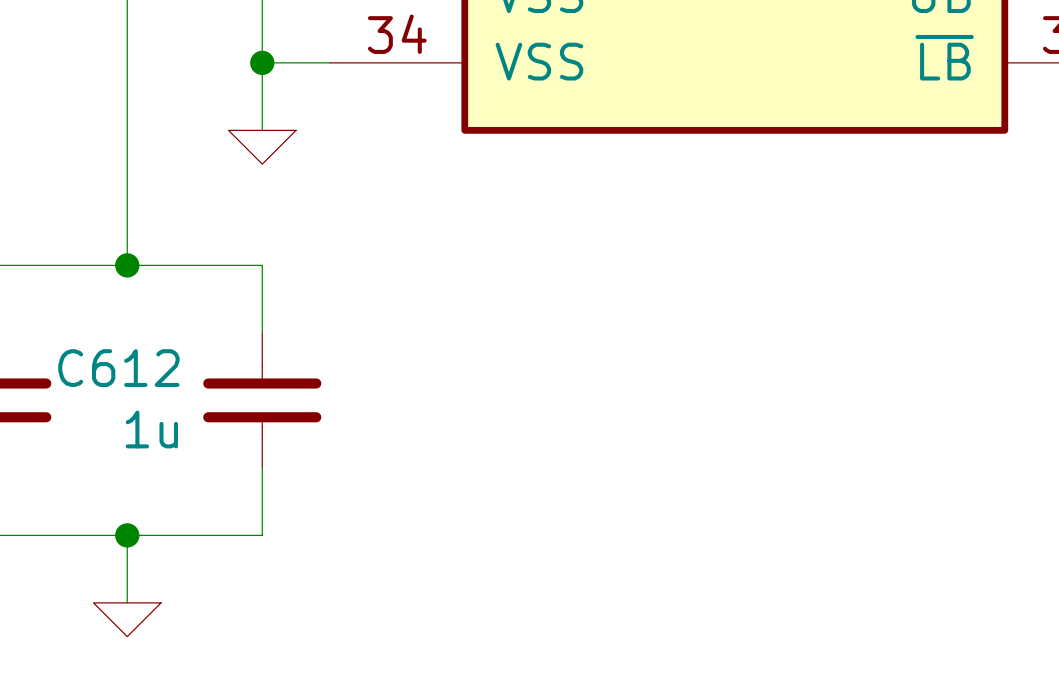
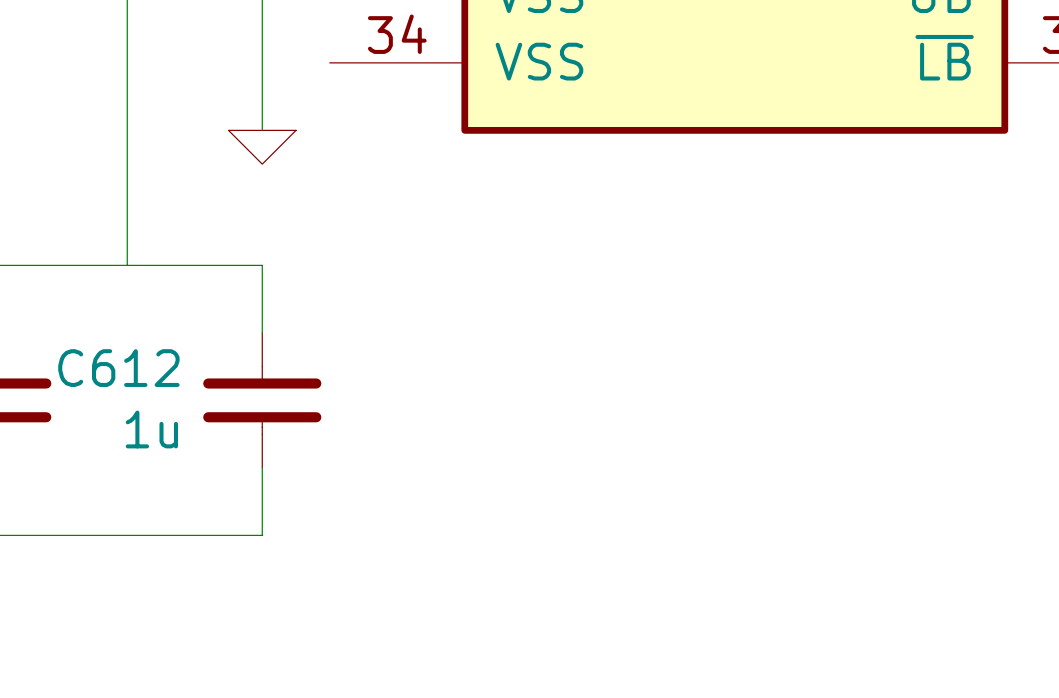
wire: (262, 62) (329, 62) -> none
junction: (262, 62) -> none
junction: (127, 265) -> none
wire: (127, 535) (127, 602) -> none
junction: (127, 535) -> none
power symbol: (127, 619) -> none

